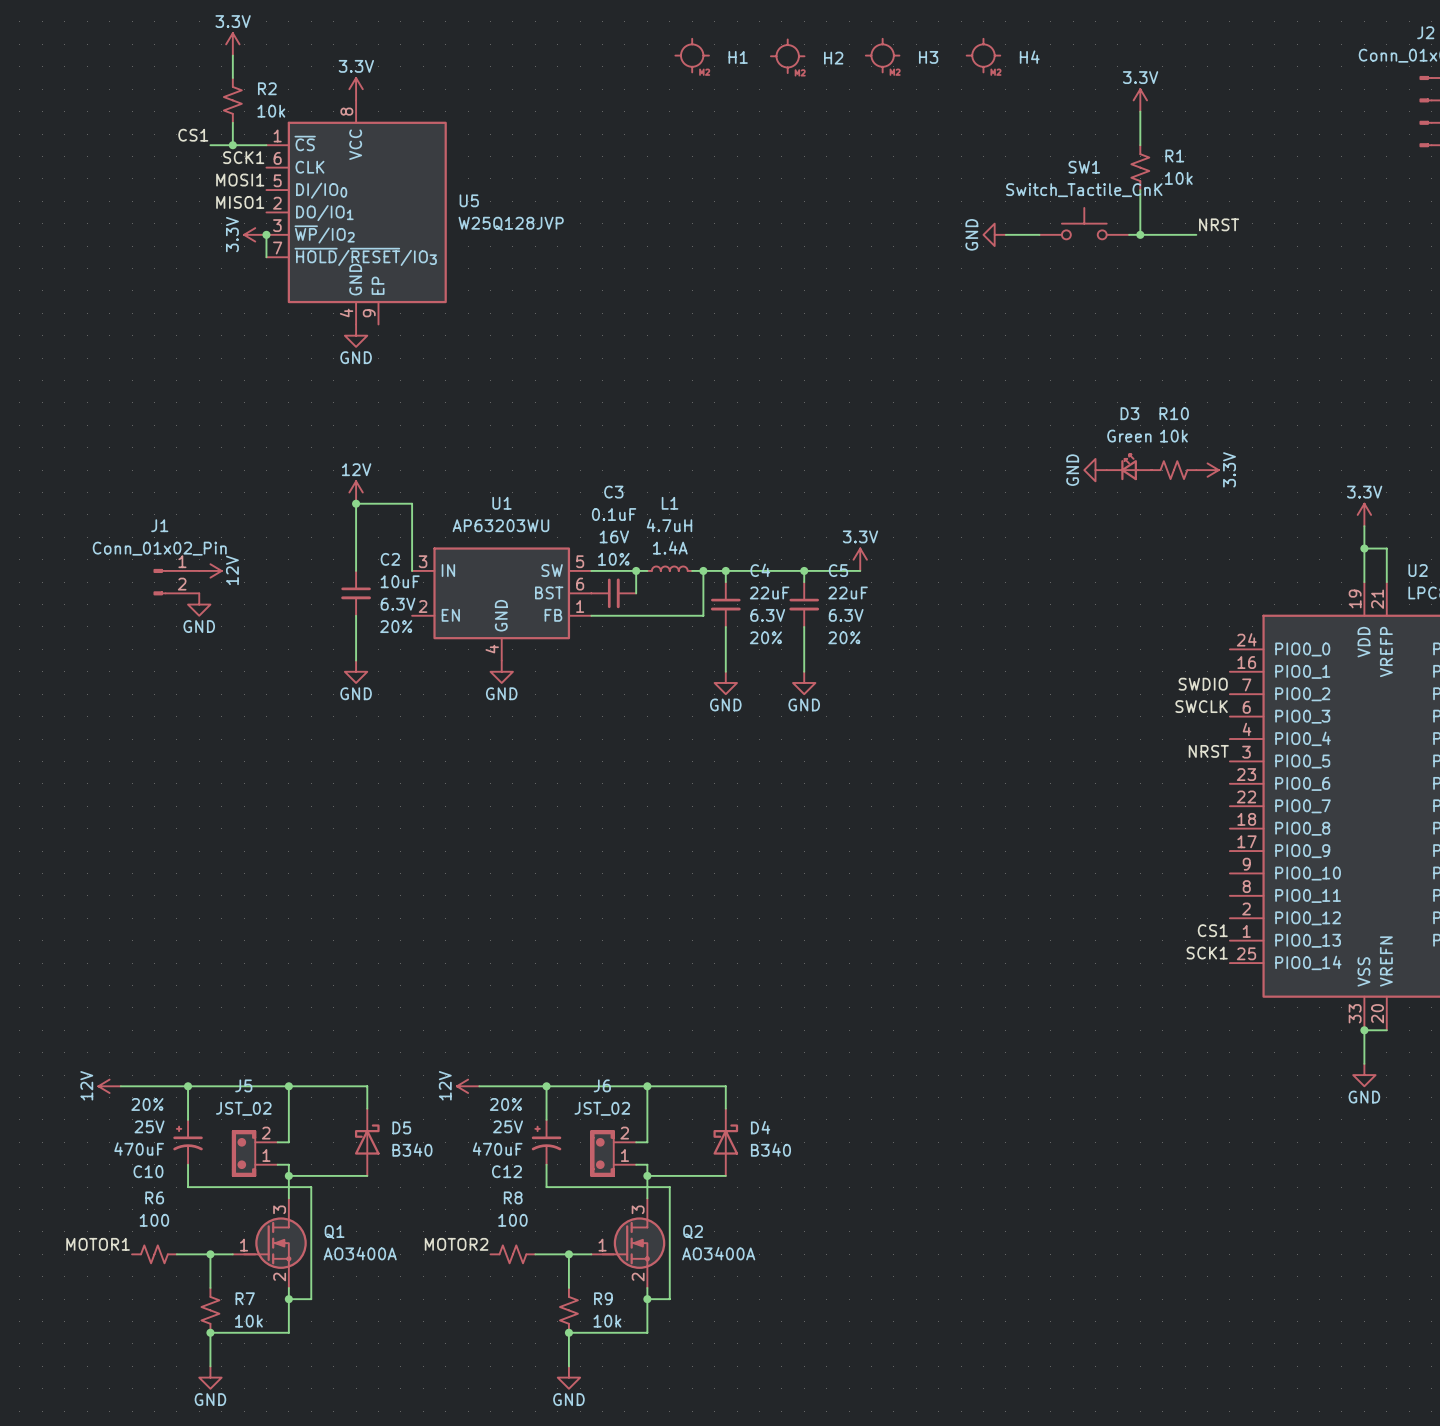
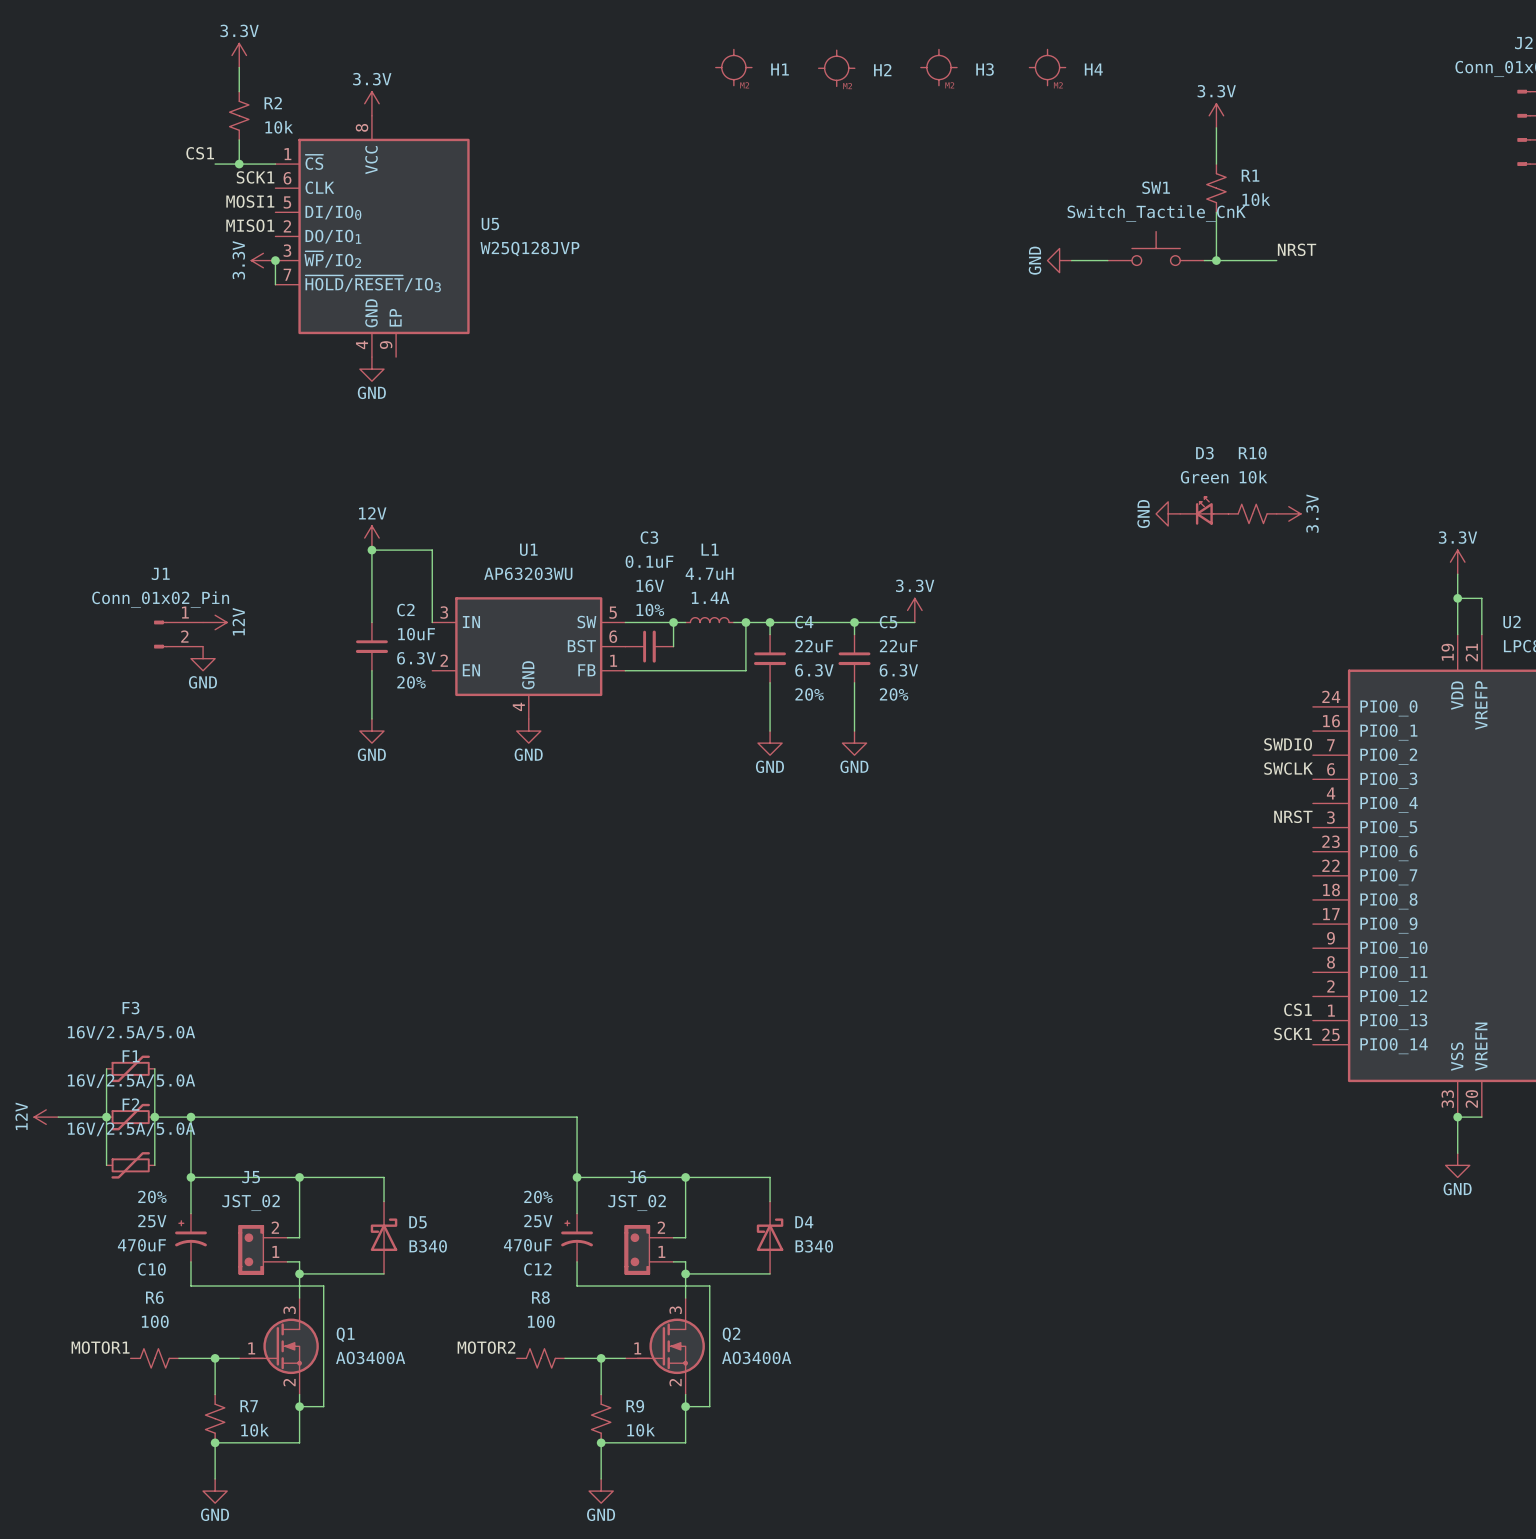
wire: none -> (106, 1068) (106, 1165)
F3: none -> 16V/2.5A/5.0A (130, 1068)
wire: none -> (154, 1068) (154, 1165)
wire: none -> (58, 1117) (106, 1117)
junction: none -> (106, 1117)
F1: none -> 16V/2.5A/5.0A (130, 1117)
junction: none -> (154, 1117)
junction: none -> (190, 1117)
F2: none -> 16V/2.5A/5.0A (130, 1165)
power symbol position: 12V (109, 1086) -> 12V (46, 1117)
wire: (120, 1086) (188, 1086) -> (190, 1117) (190, 1177)
power symbol: 12V (468, 1086) -> none
wire: (479, 1086) (546, 1086) -> (154, 1117) (577, 1117) (577, 1177)

